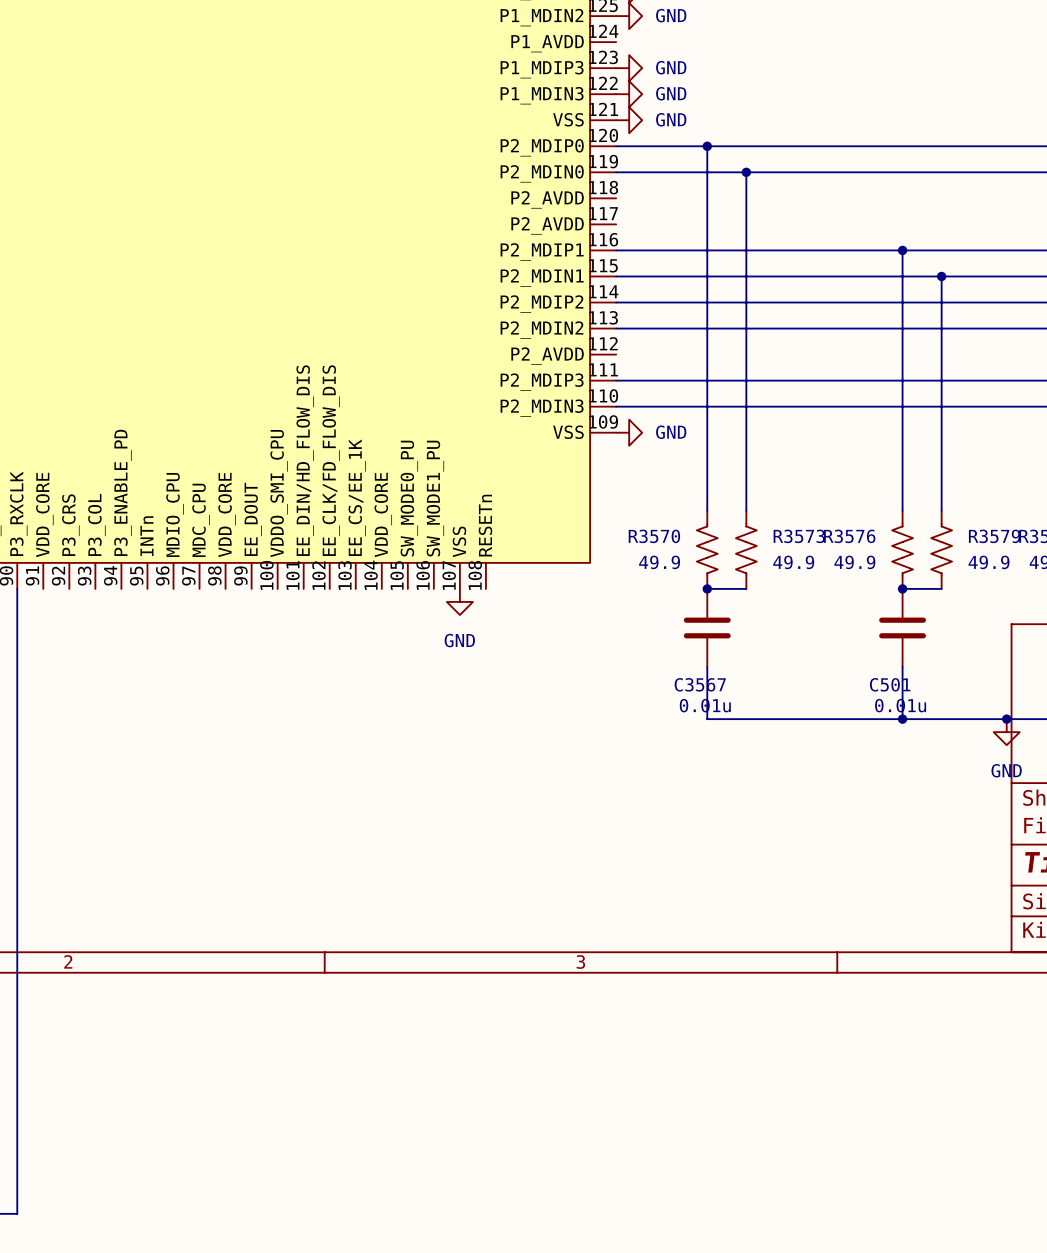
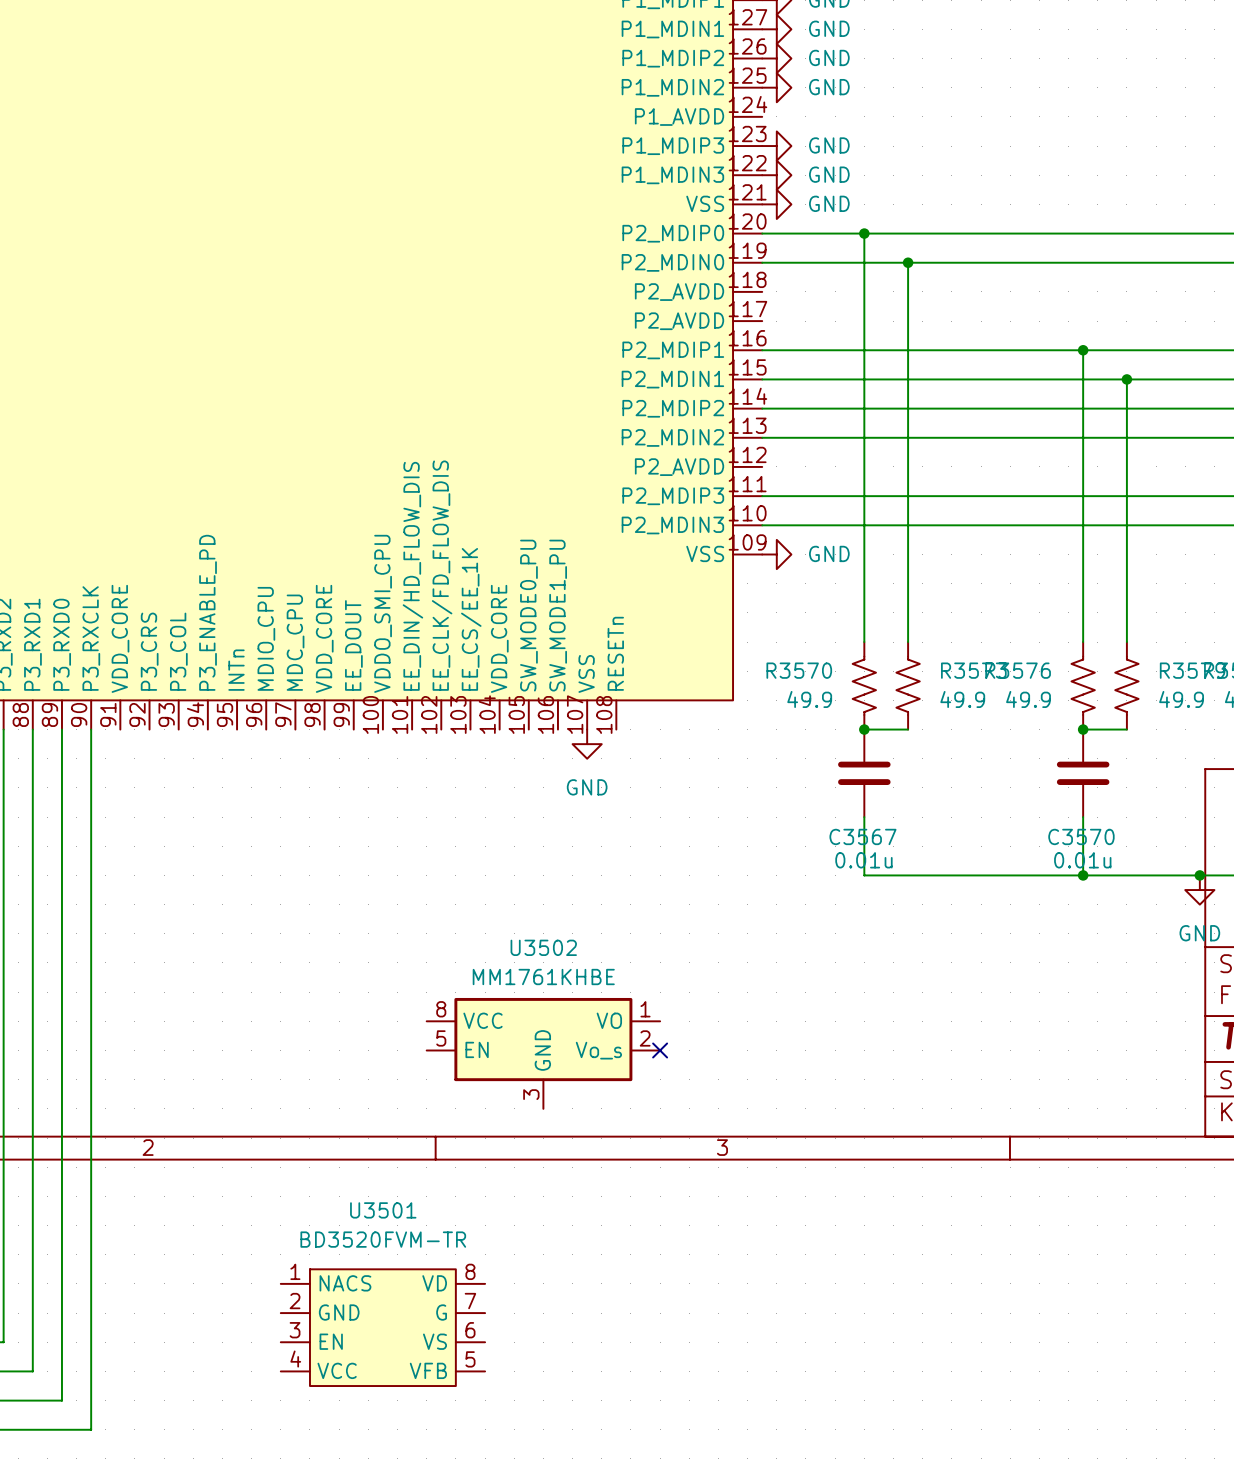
C501 name: C501 (890, 684) -> C3570 (1081, 836)
no-connect mark: none -> (660, 1050)
U3502: none -> MM1761KHBE (543, 1053)
U3501: none -> BD3520FVM-TR (382, 1327)

